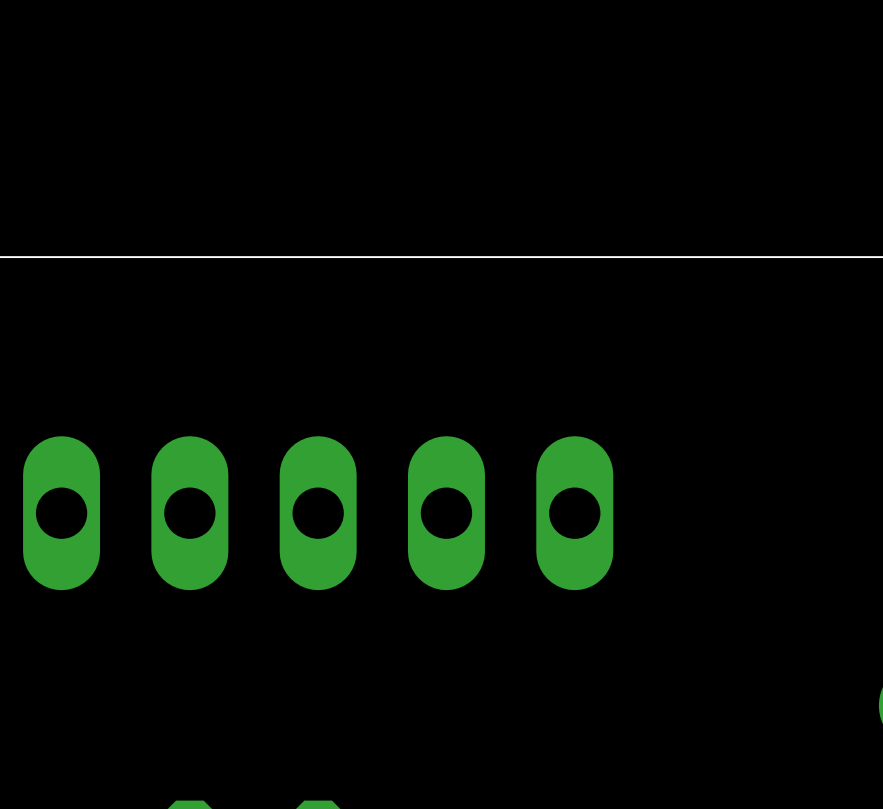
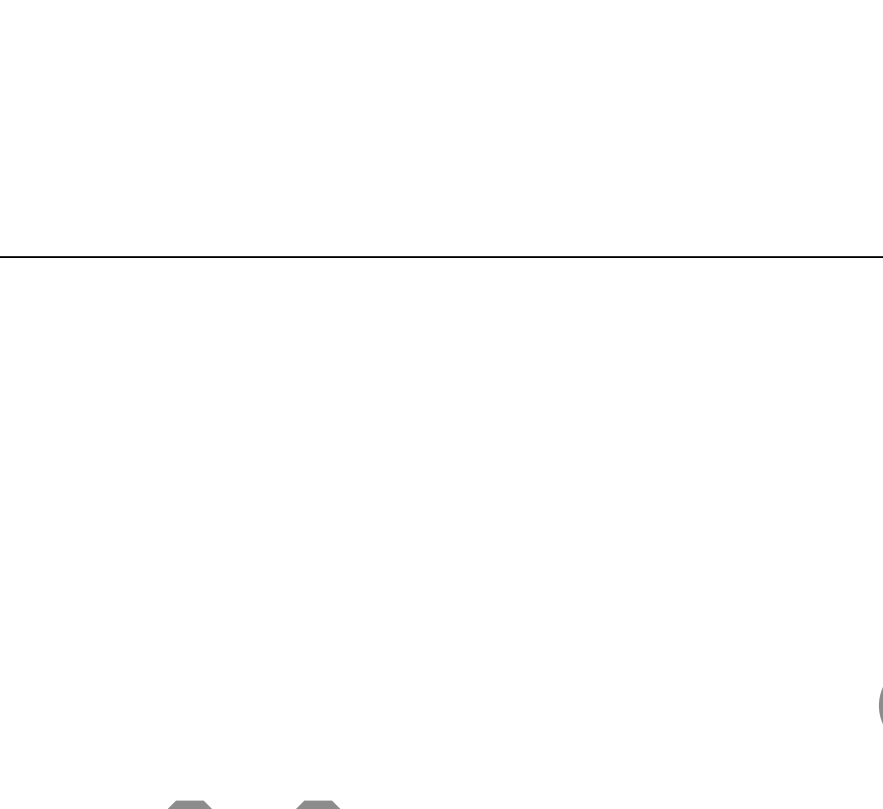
part: (318, 513) -> none

